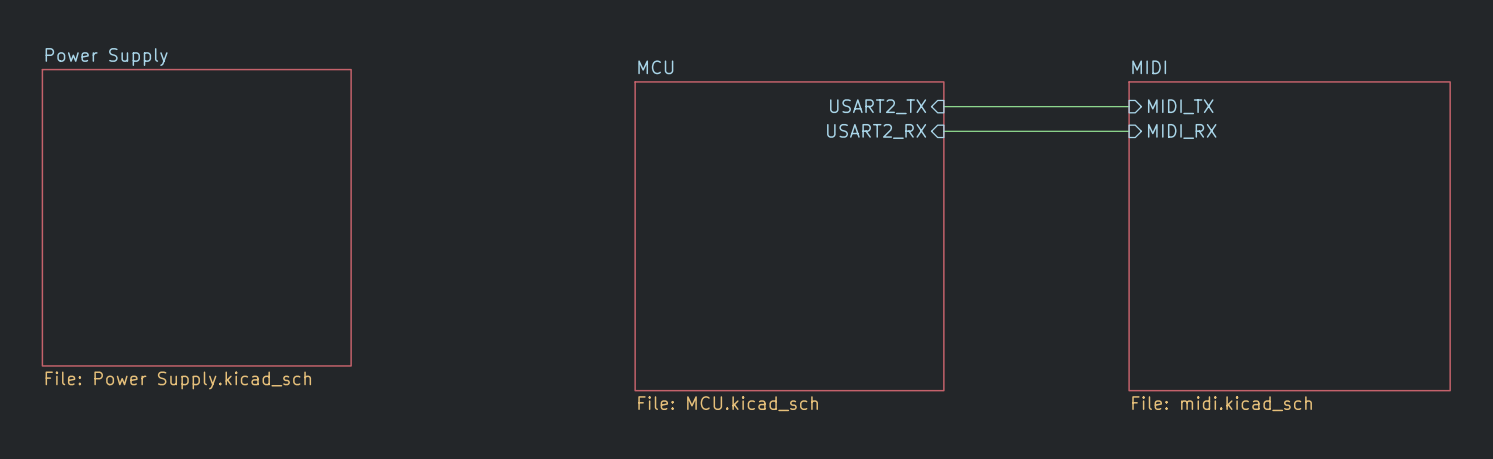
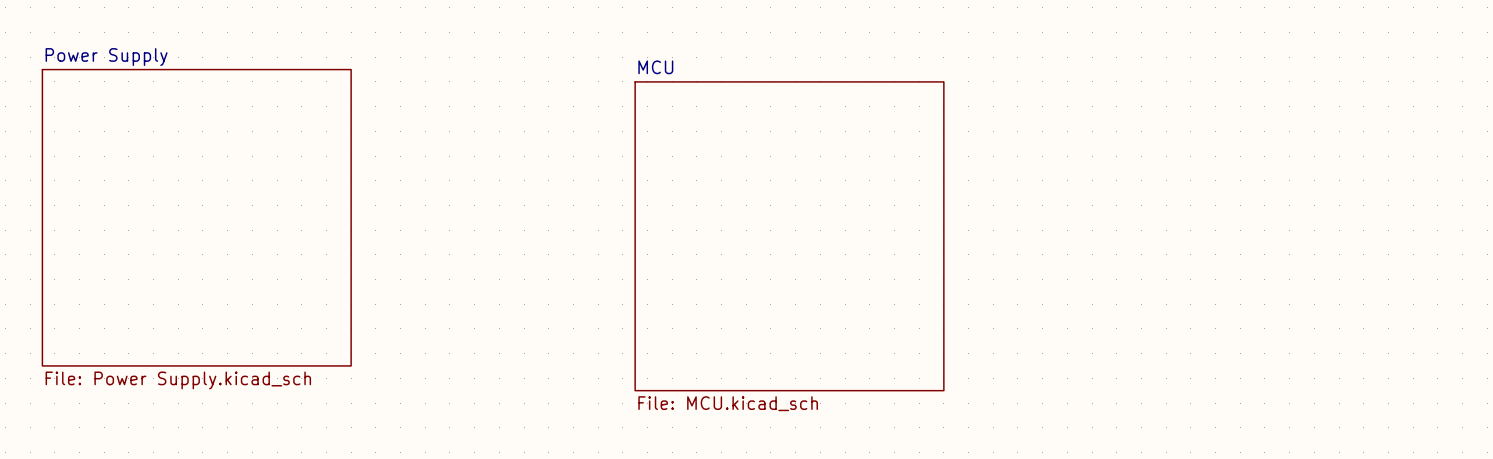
sheet pin: USART2_TX (878, 106) -> none
wire: (943, 106) (1129, 106) -> none
sheet pin: MIDI_TX (1180, 106) -> none
sheet pin: USART2_RX (876, 131) -> none
wire: (943, 131) (1129, 131) -> none
sheet pin: MIDI_RX (1182, 131) -> none
sheet MIDI: File: midi.kicad_sch (1289, 236) -> none

